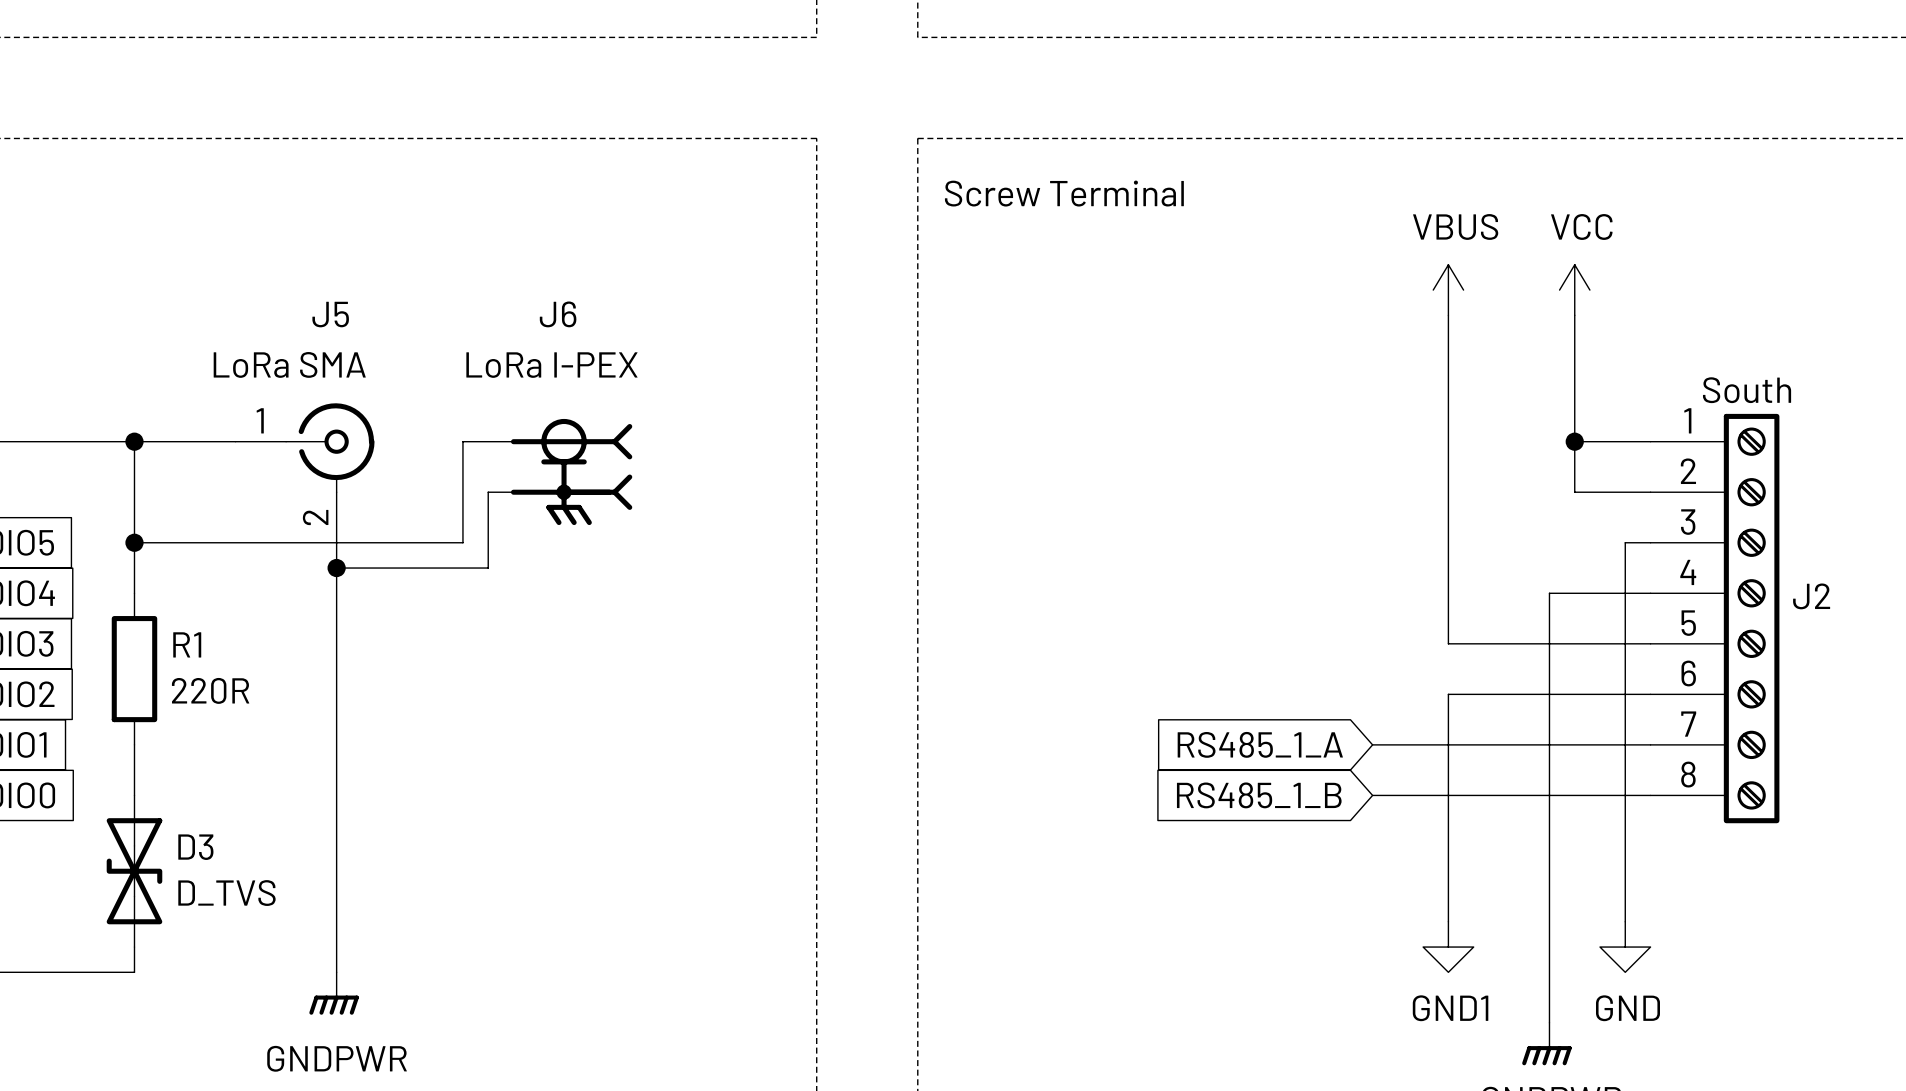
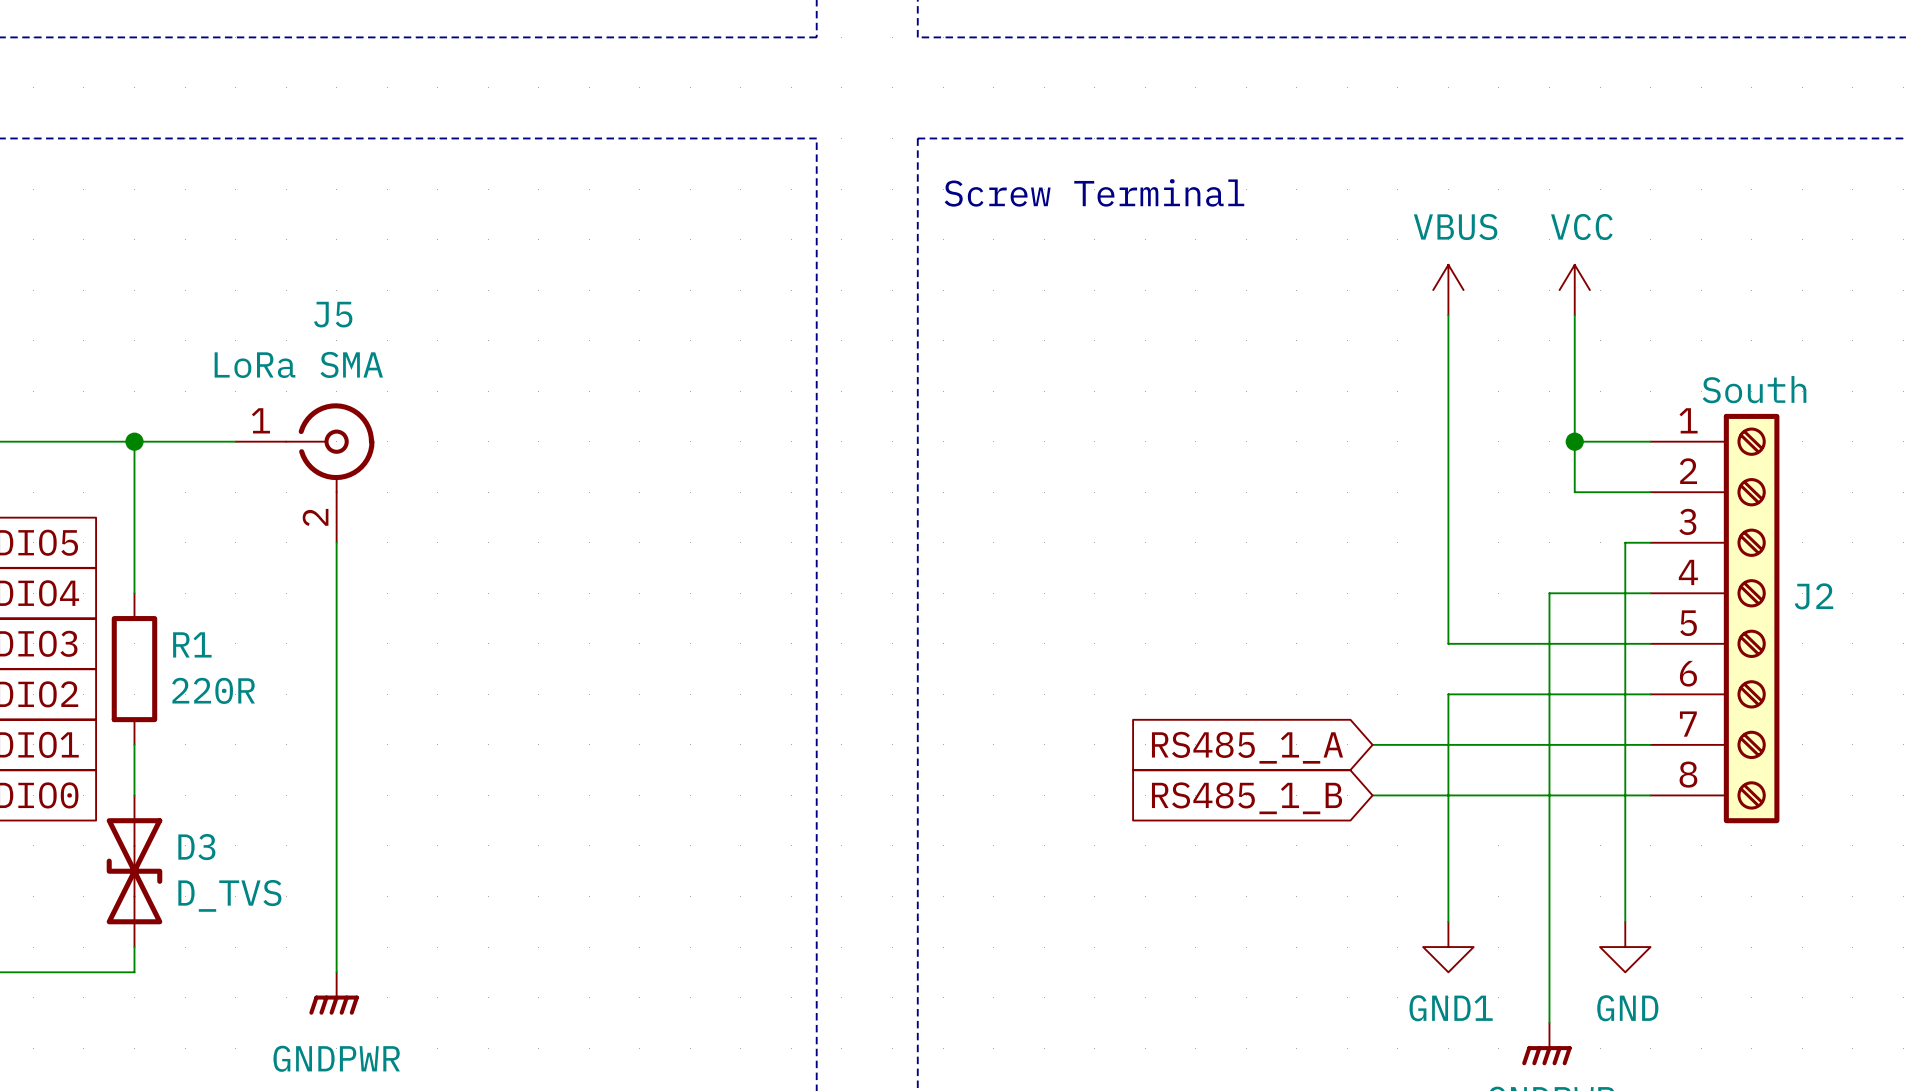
wire: (513, 441) (462, 441) (462, 542) (134, 542) -> none
J6: LoRa I-PEX (571, 472) -> none
wire: (513, 492) (488, 492) (488, 568) (336, 568) -> none
junction: (134, 542) -> none
junction: (336, 568) -> none

